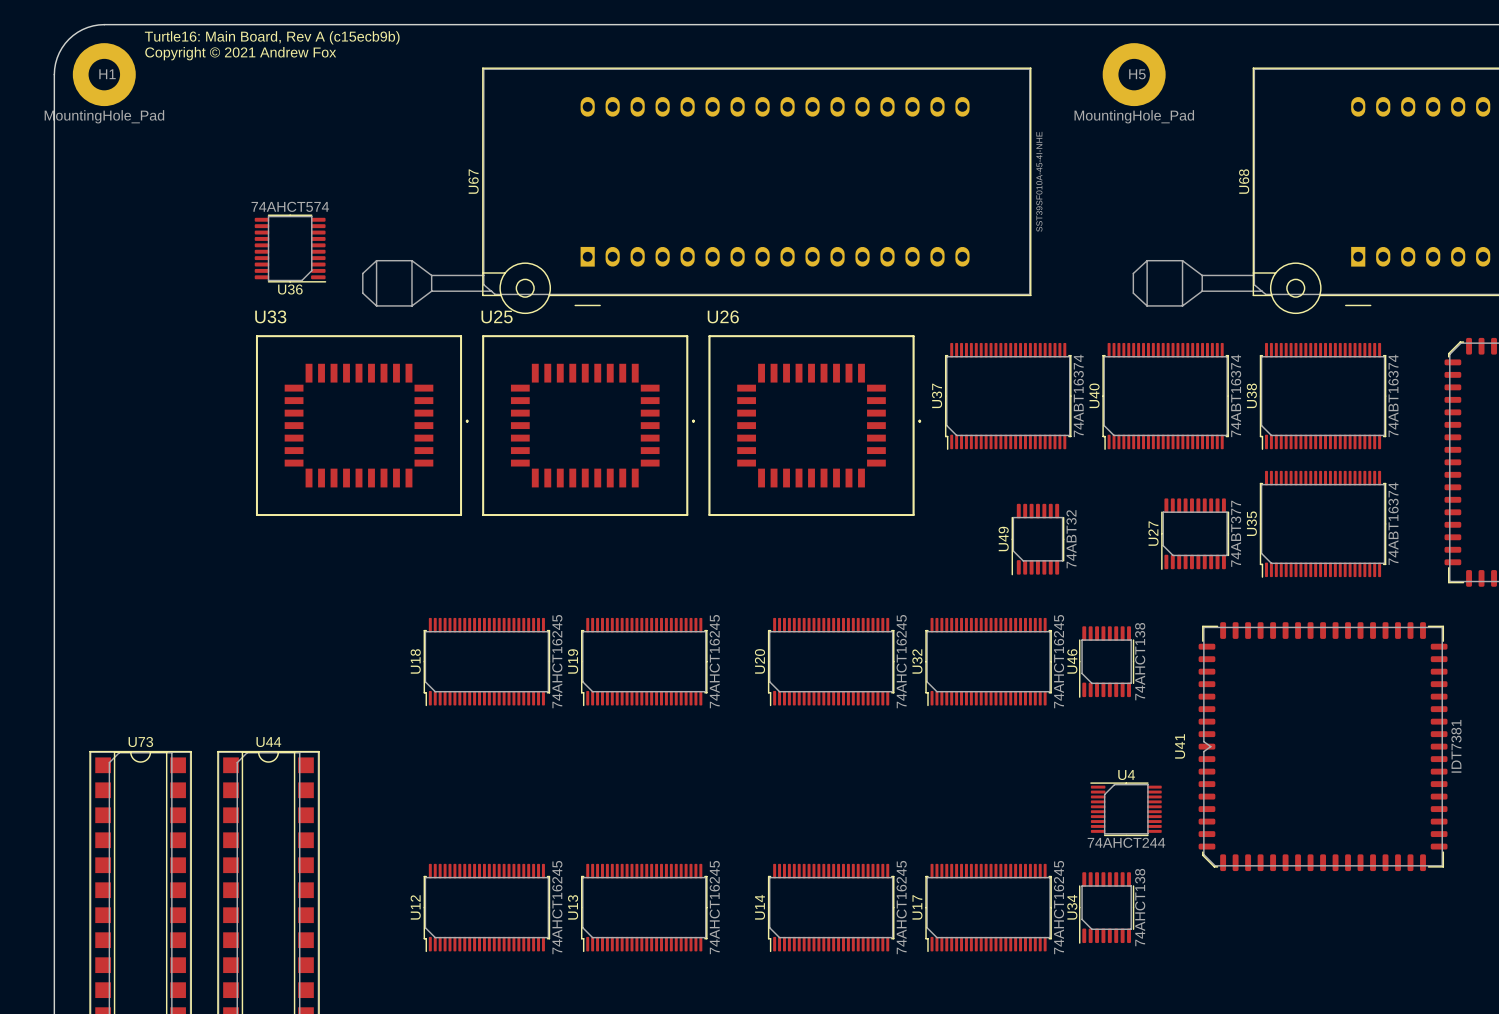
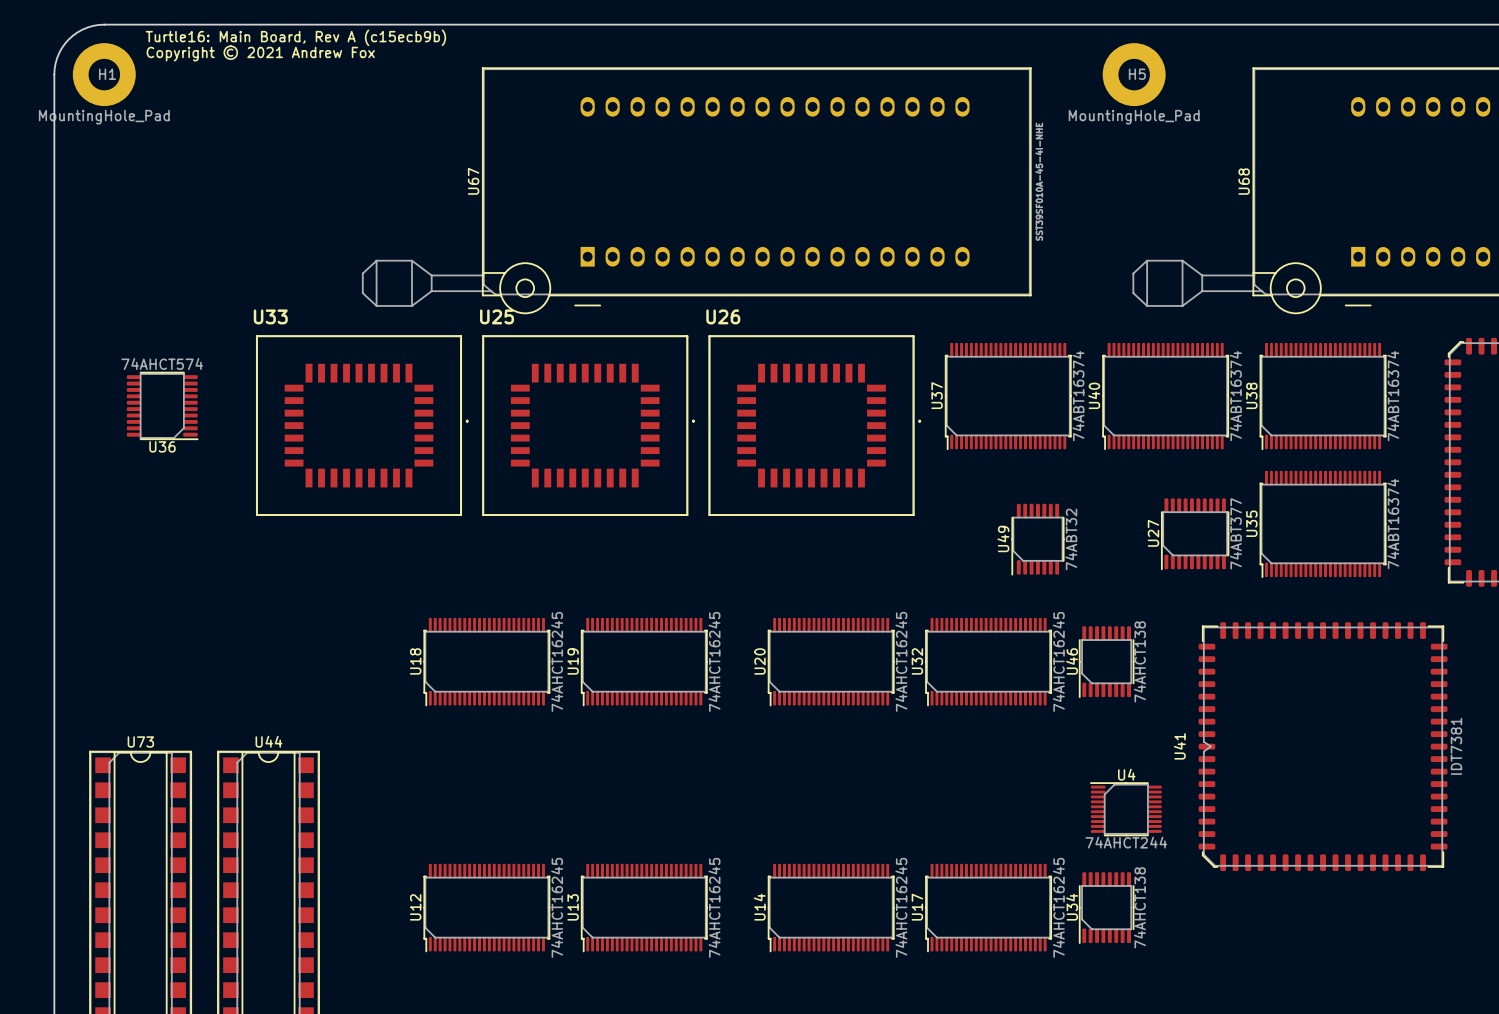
U36 position: (290, 248) -> (162, 405)

